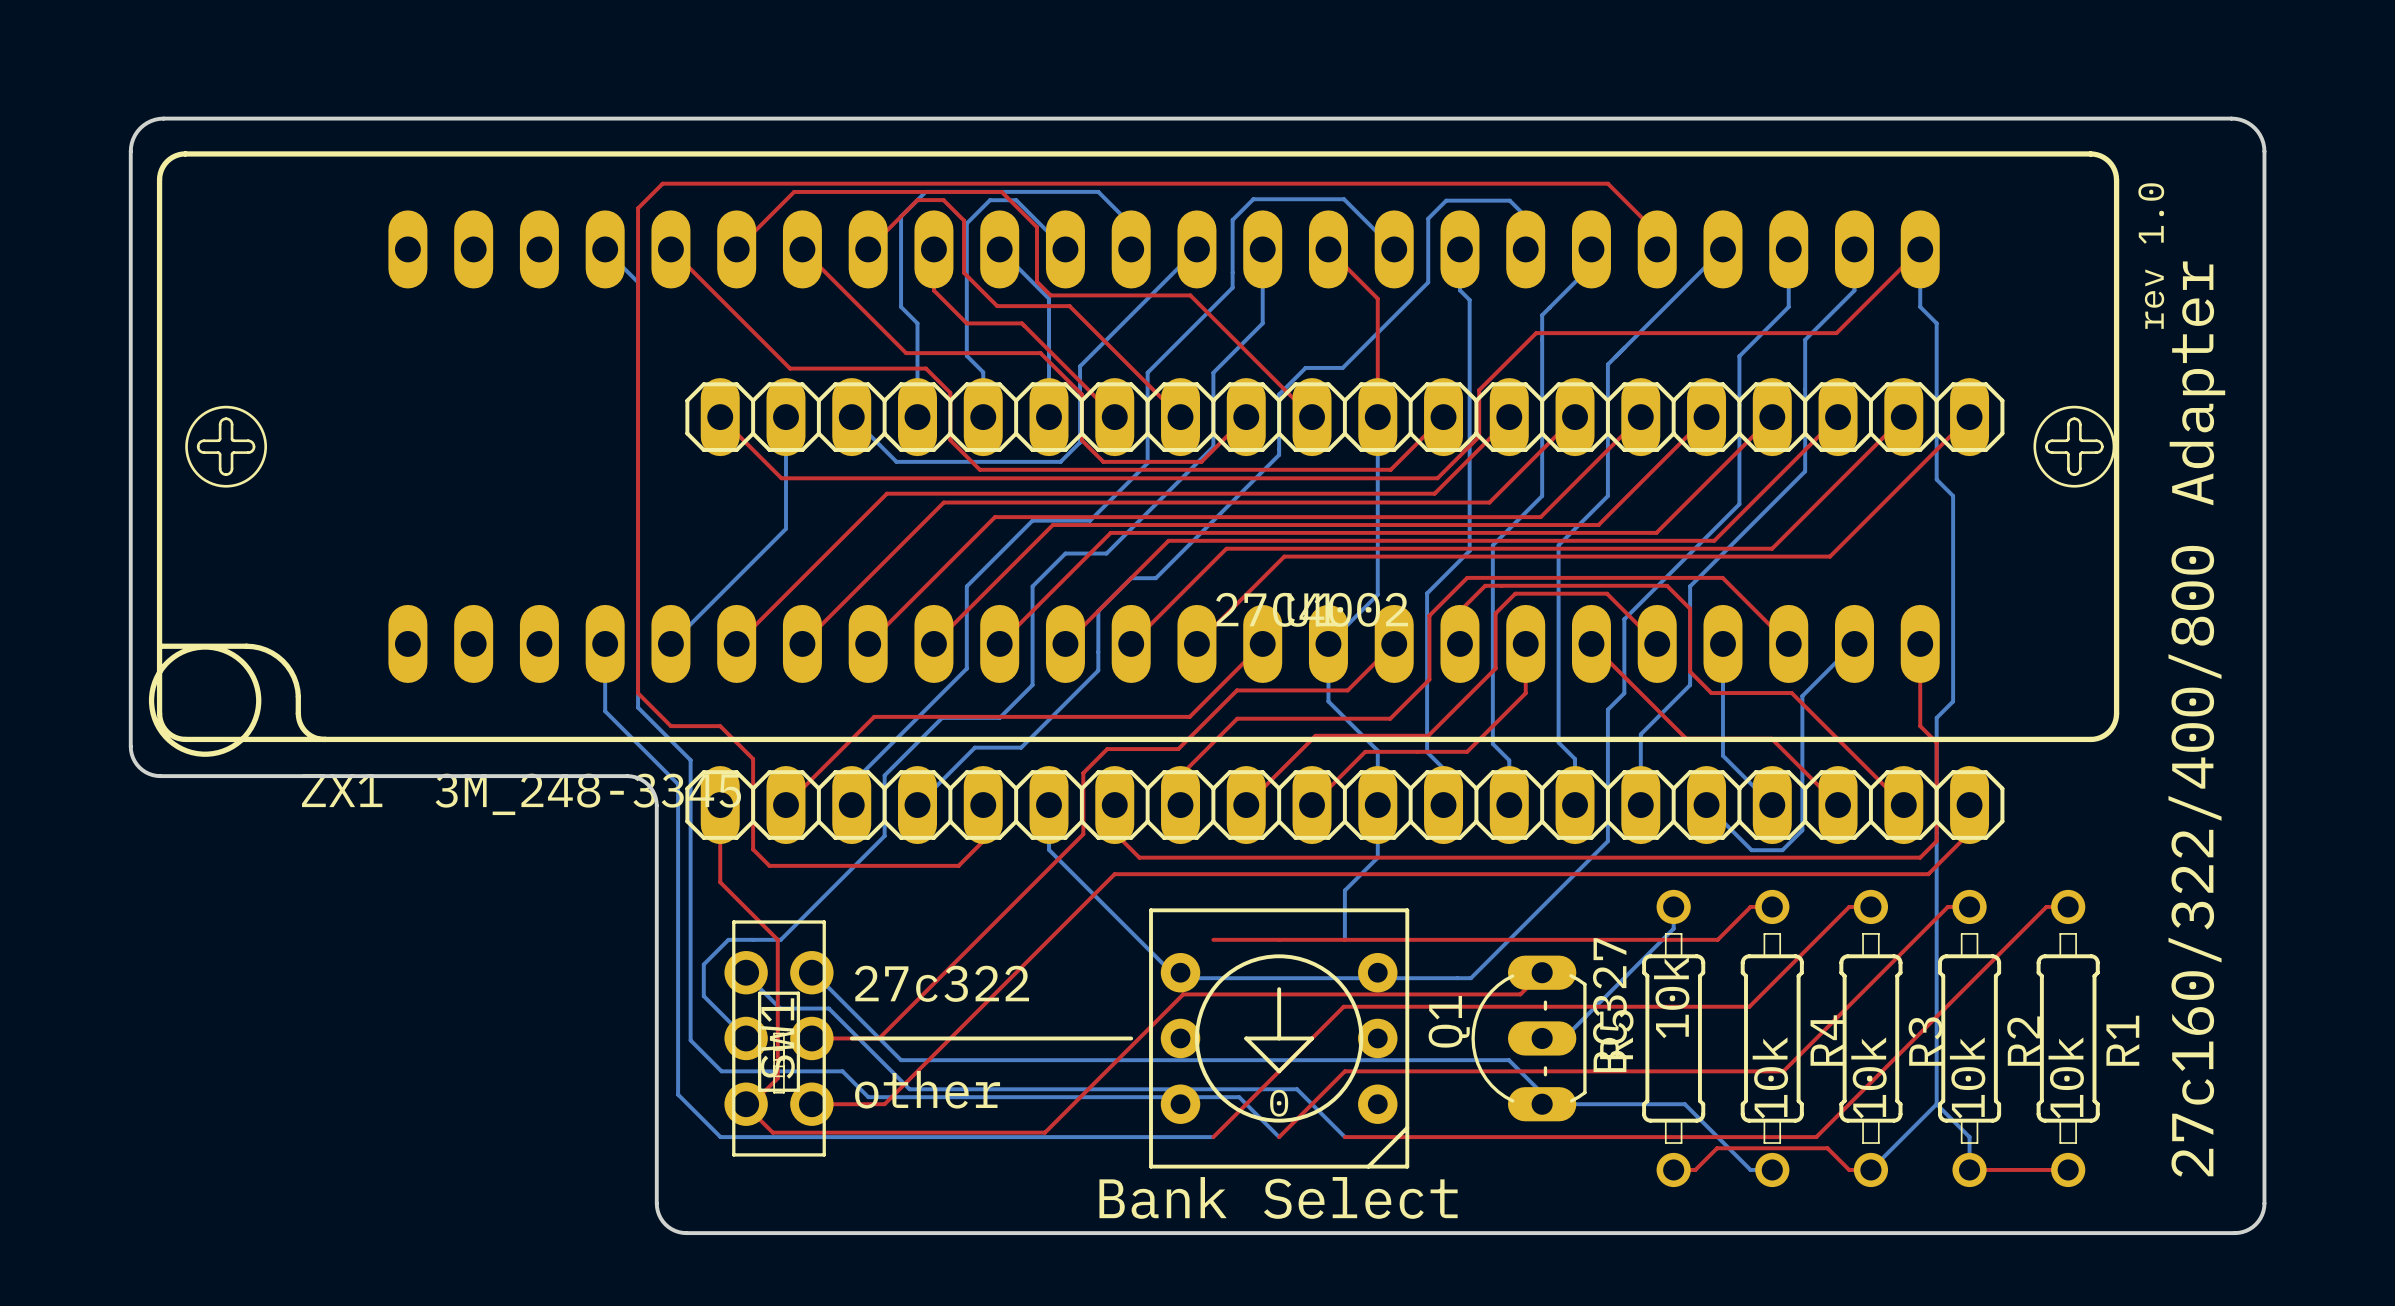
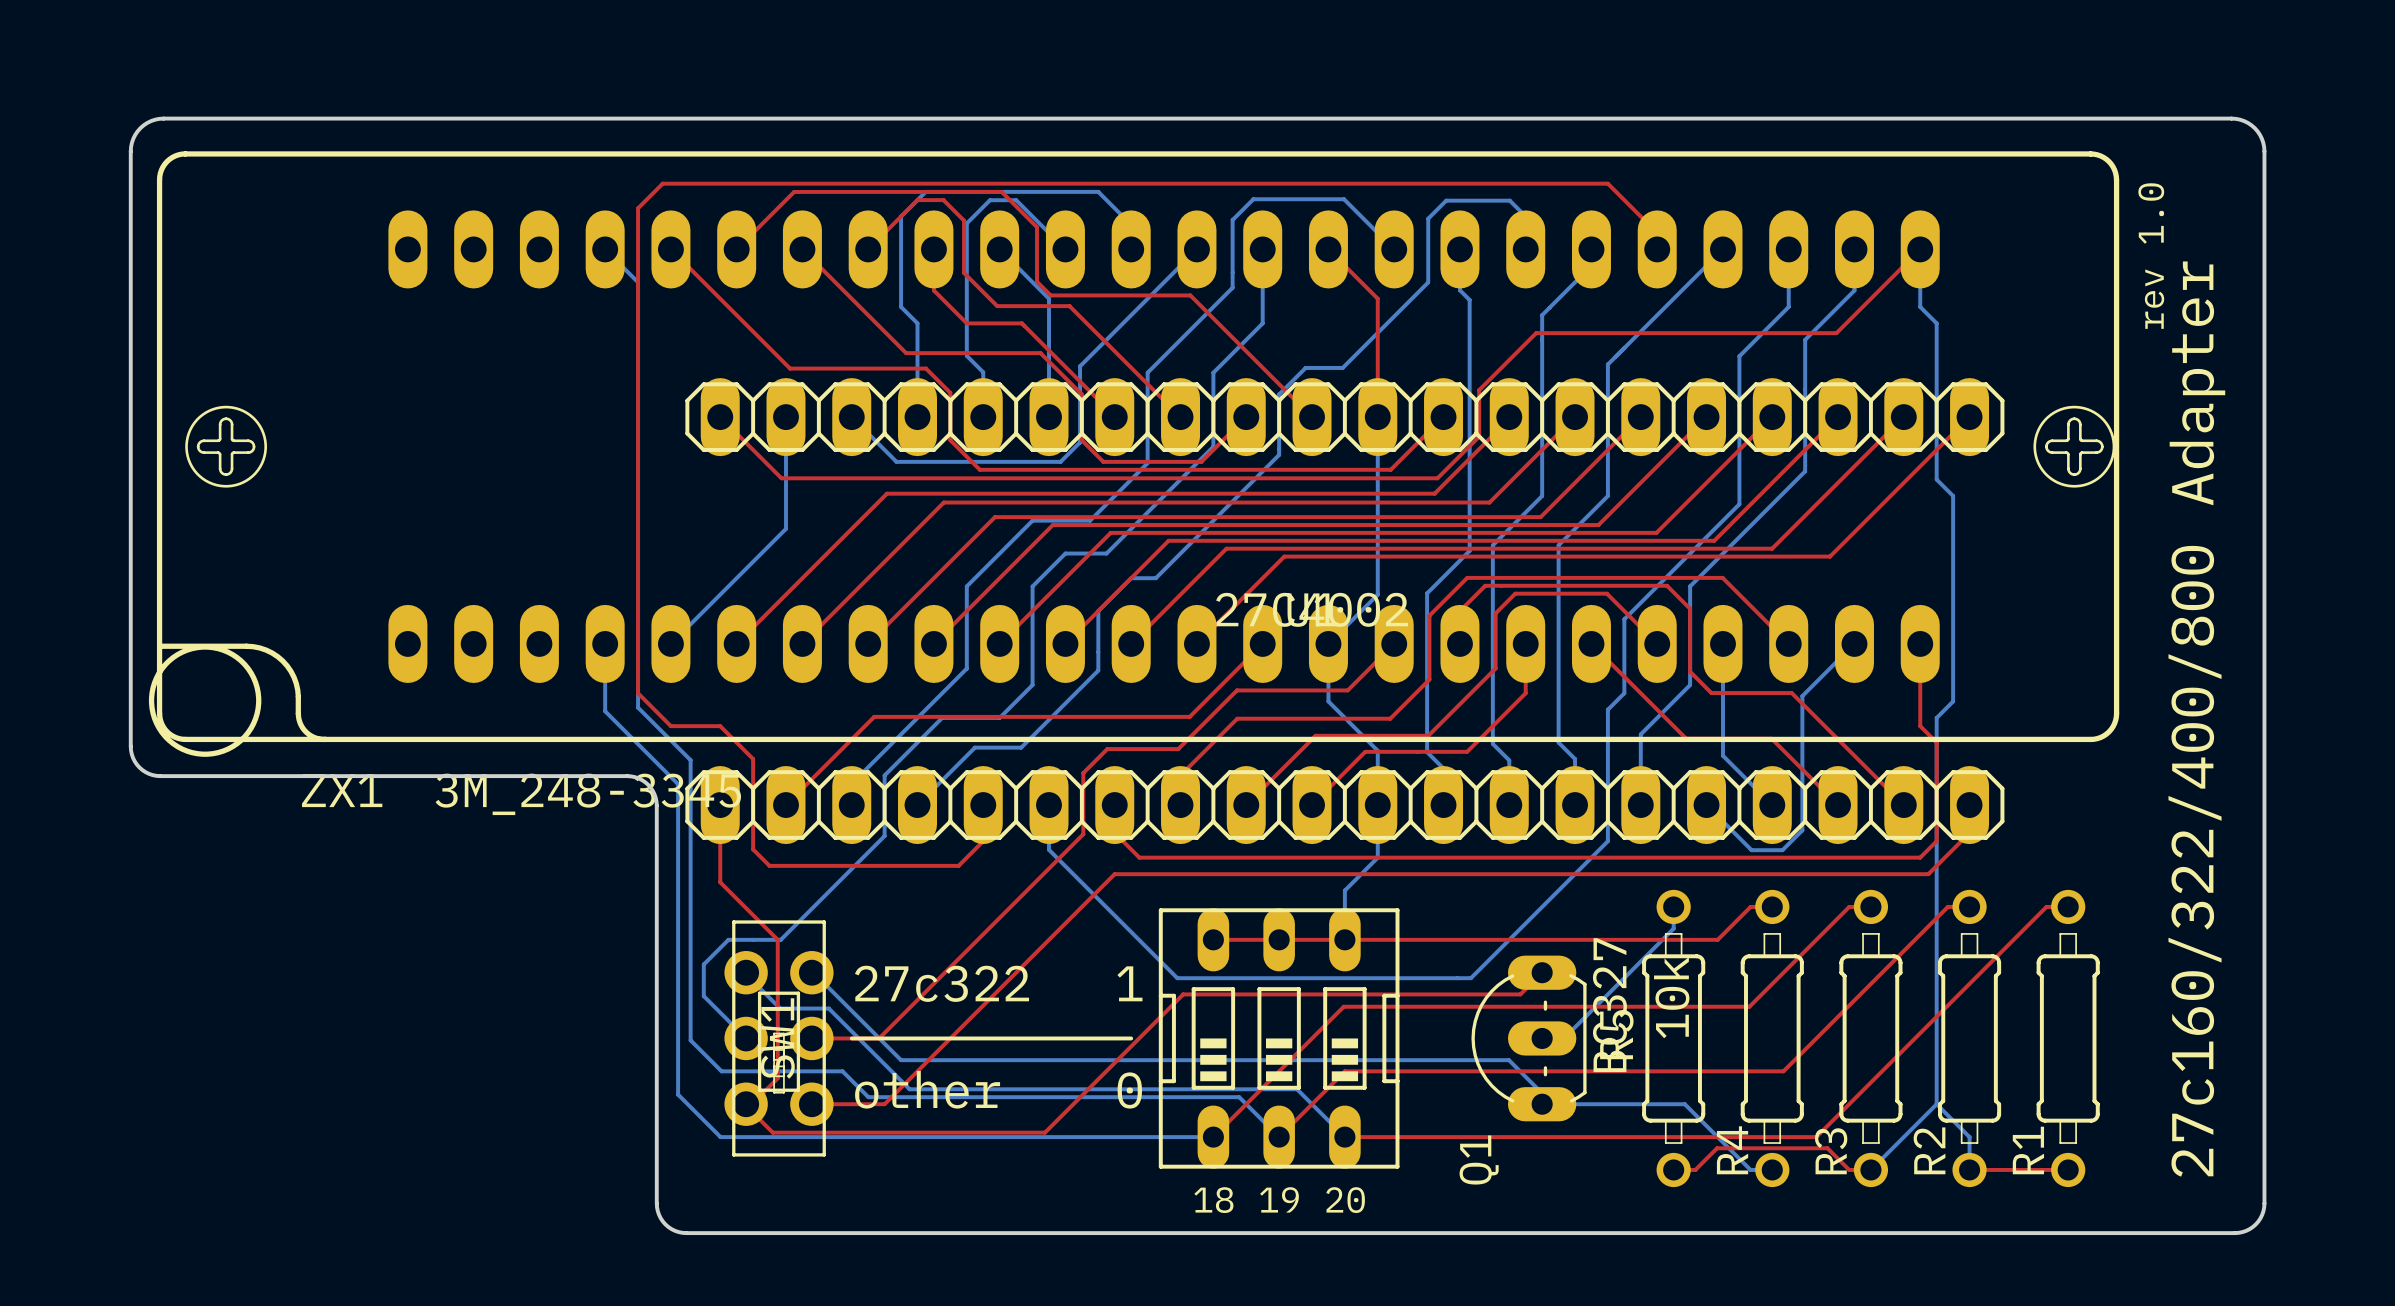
part footprint: [1149, 908, 1410, 1169] -> [1158, 908, 1400, 1169]
text: none -> 1 (1129, 983)
Q1 name position: Q1 (1449, 1021) -> Q1 (1479, 1160)
R4 name position: R4 (1826, 1040) -> R4 (1732, 1150)
R1 name position: R1 (2122, 1040) -> R1 (2028, 1150)
R3 name position: R3 (1925, 1041) -> R3 (1831, 1151)
R2 name position: R2 (2023, 1041) -> R2 (1929, 1150)
R4 value: 10k (1770, 1077) -> none
R3 value: 10k (1868, 1077) -> none
R2 value: 10k (1967, 1077) -> none
R1 value: 10k (2066, 1077) -> none
text: none -> 0 (1129, 1090)
text: Bank Select (1278, 1197) -> none
text: none -> 19 (1279, 1199)
text: none -> 18 (1213, 1200)
text: none -> 20 (1345, 1200)

